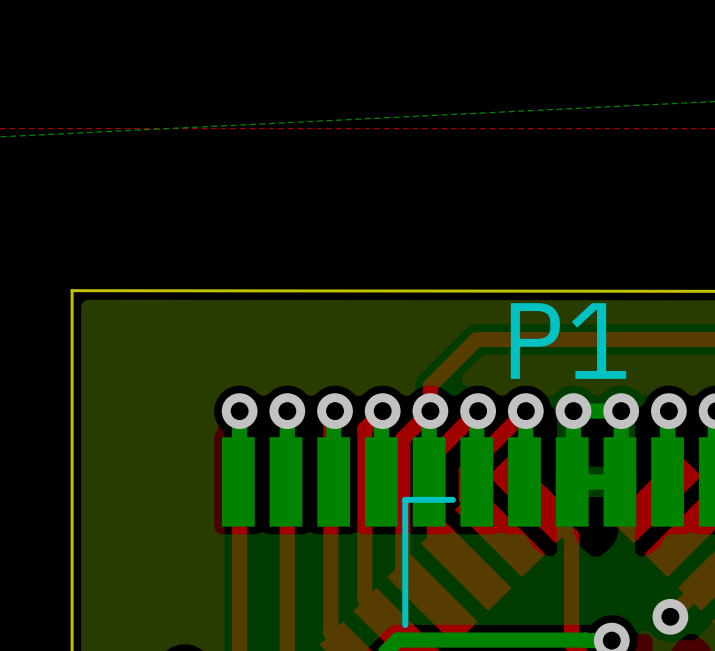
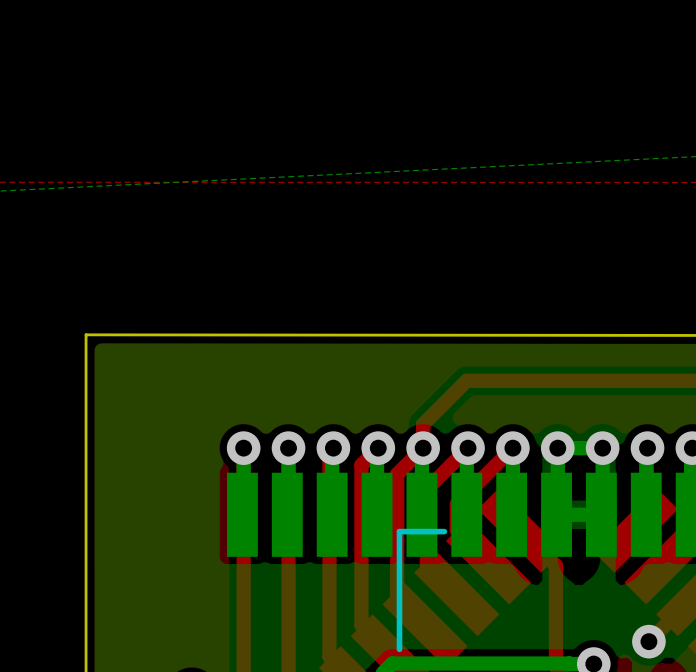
P1 name: P1 (568, 341) -> none

